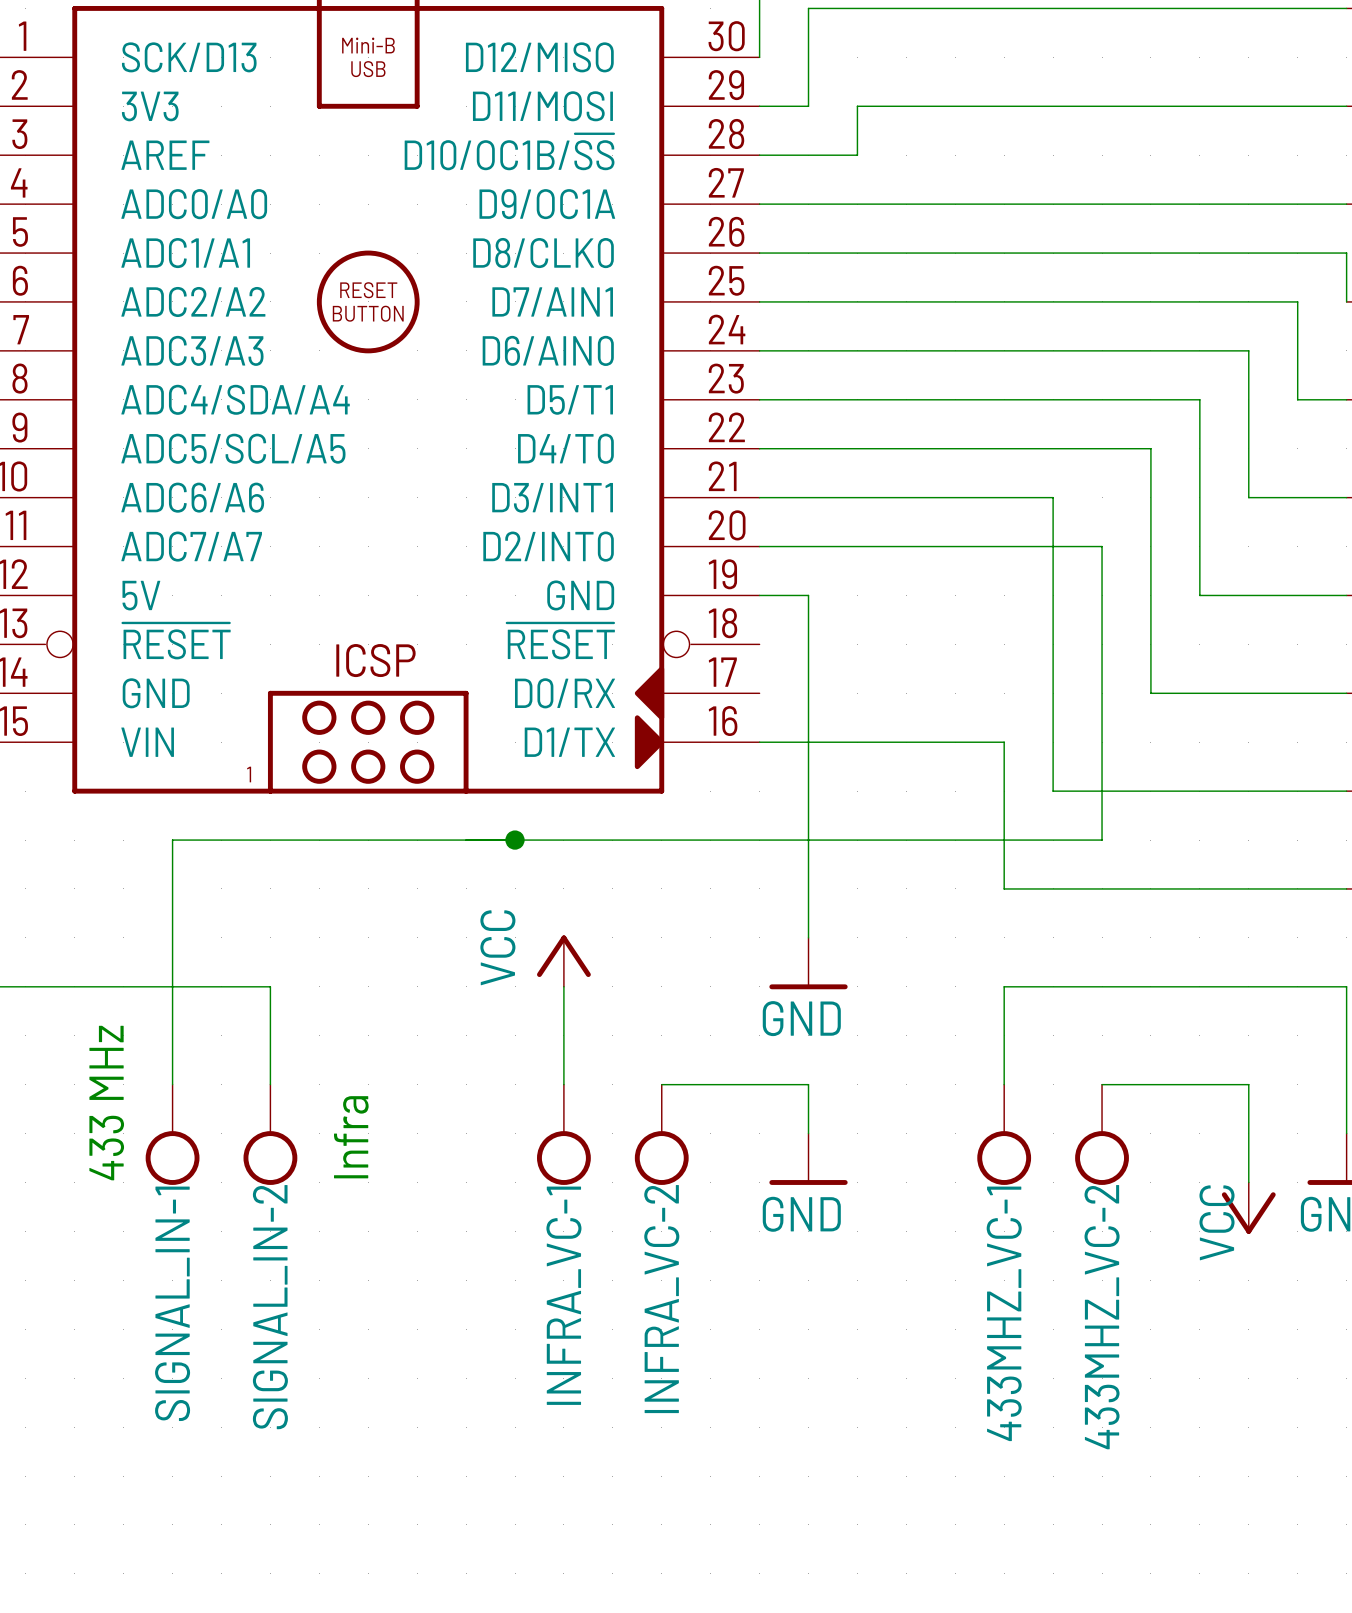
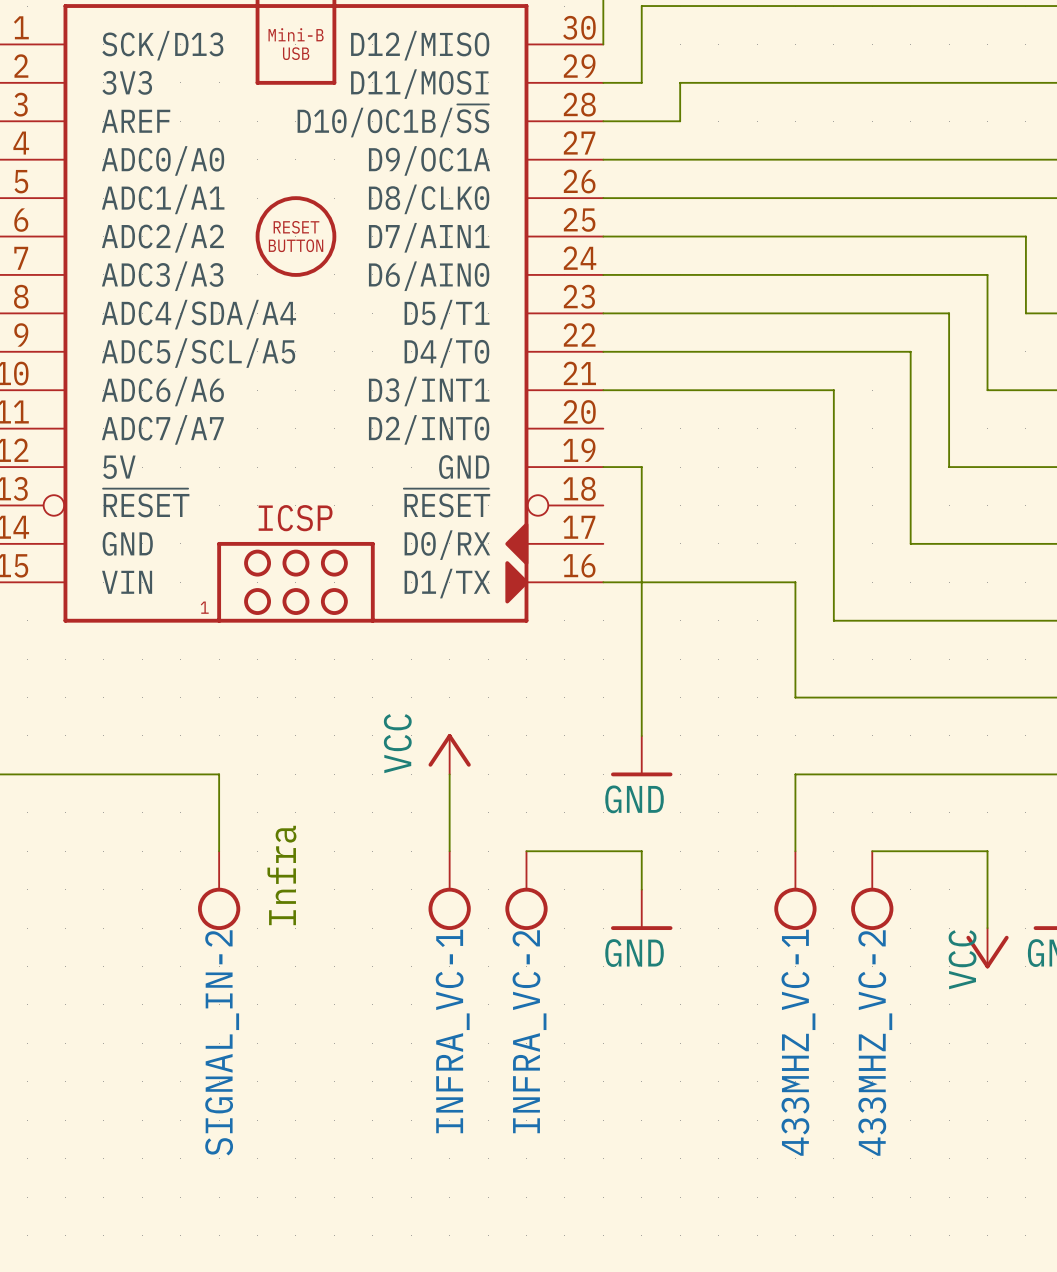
wire: (759, 546) (1102, 546) (1102, 840) (172, 840) (172, 1084) -> none
junction: (515, 840) -> none
text: 433 MHz (106, 1103) -> none
SIGNAL_IN-1: (172, 1134) -> none

